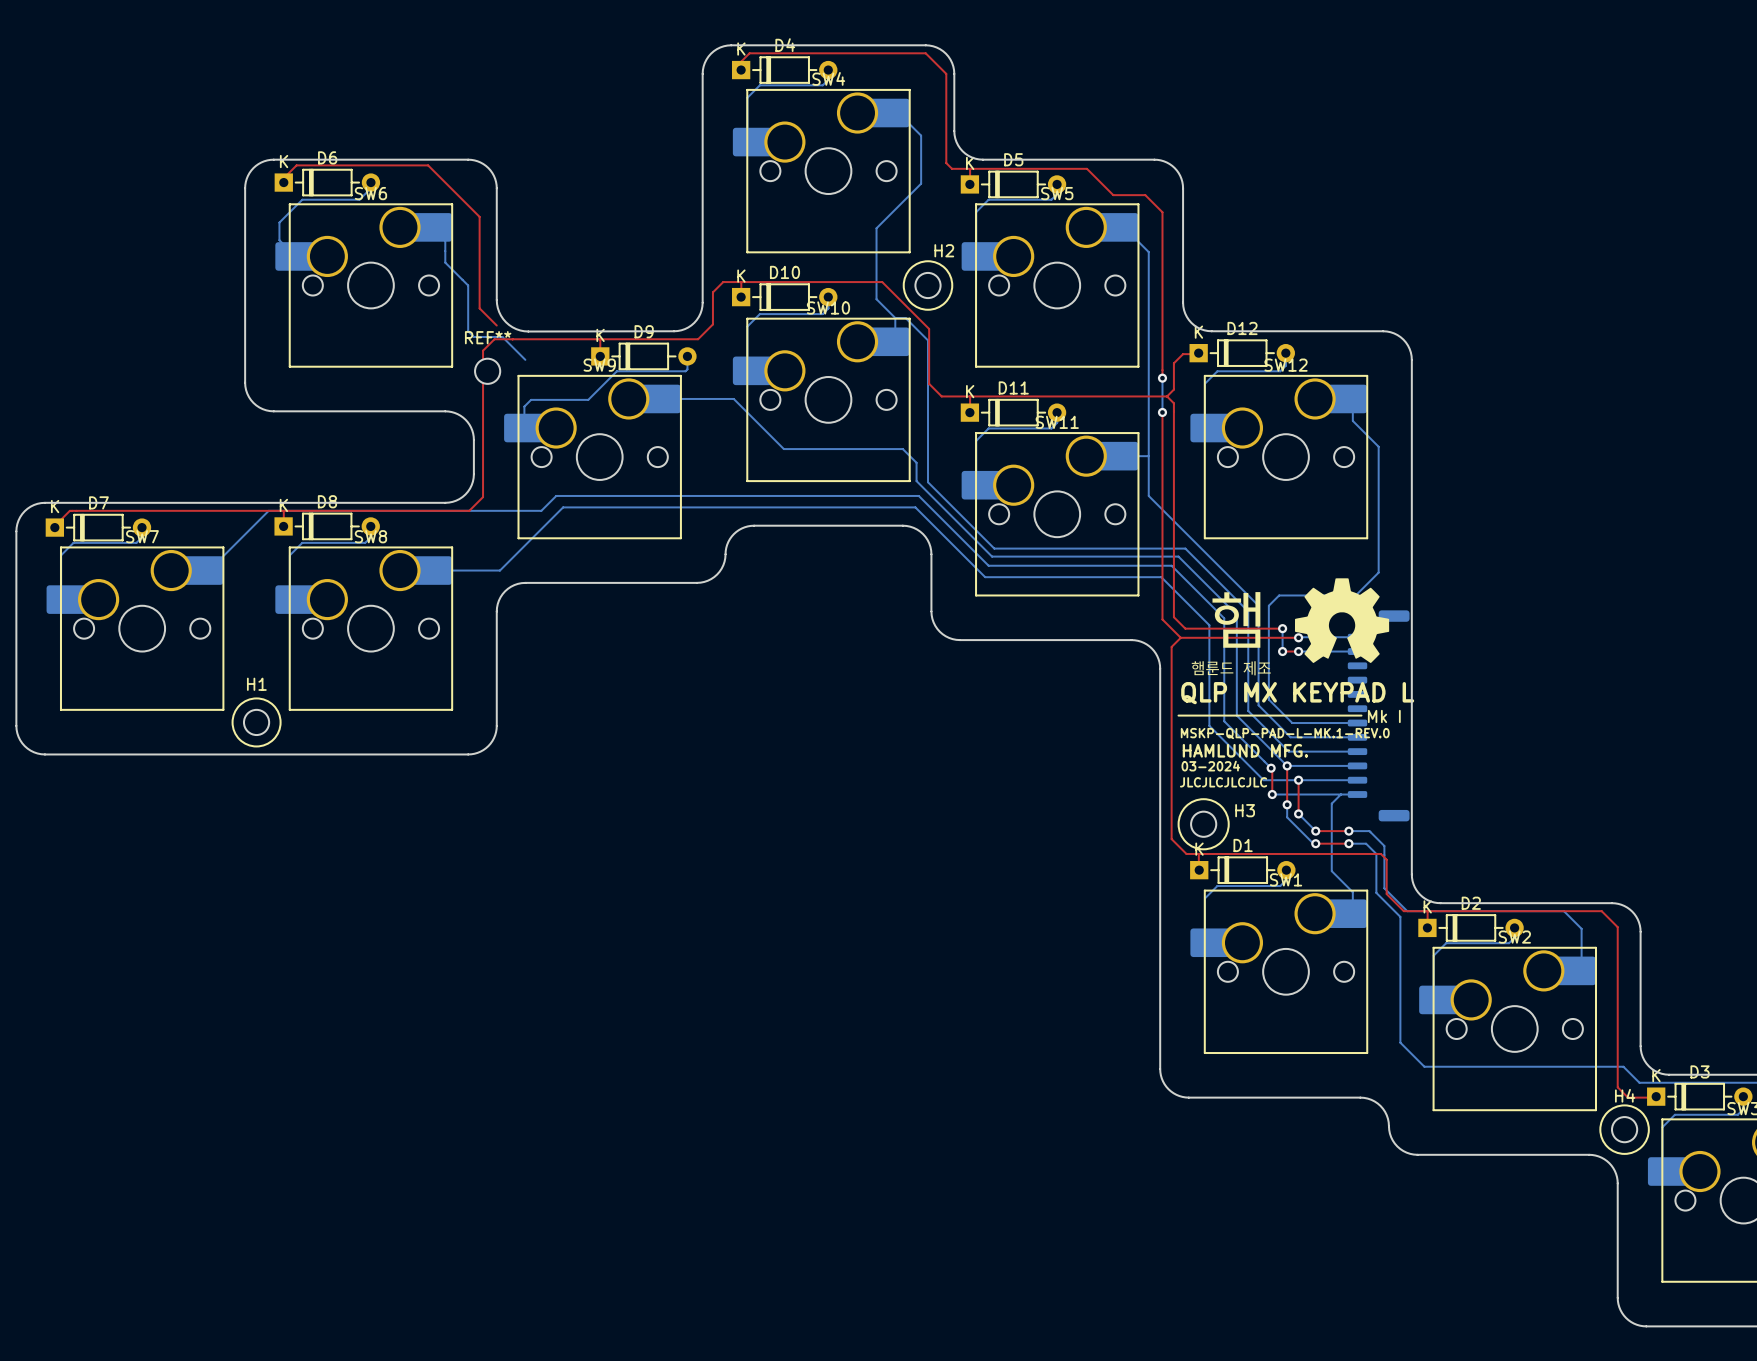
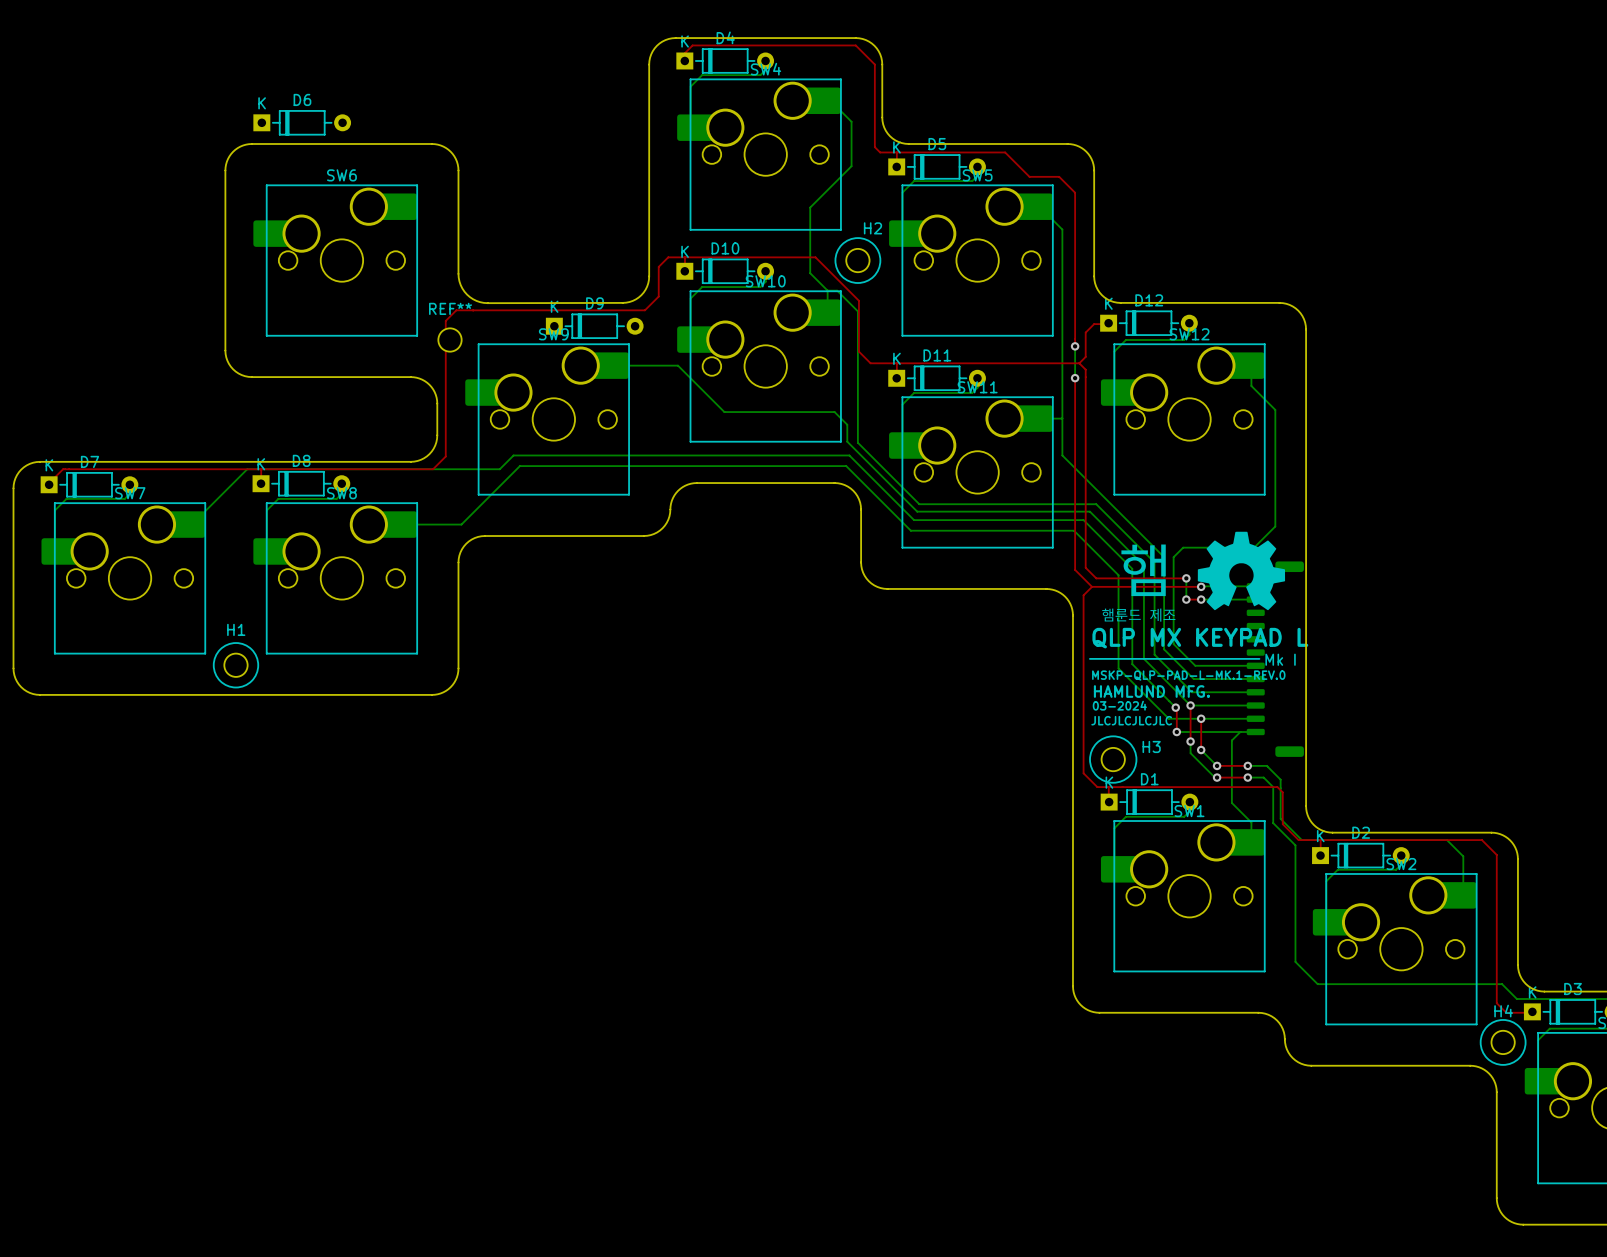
top track: (283, 182) (283, 178) (296, 165) (428, 165) (479, 216) (479, 308) (496, 325) -> none
D6 position: (327, 182) -> (302, 122)
bottom track: (370, 182) (370, 188) (359, 199) (302, 199) (279, 222) (279, 240) (295, 256) -> none
bottom track: (431, 227) (445, 240) (445, 262) (468, 285) (468, 331) (473, 336) (502, 336) (525, 359) -> none
top track: (599, 339) (600, 356) -> none
bottom track: (687, 356) (687, 369) (685, 371) (616, 371) (588, 399) (531, 399) (524, 406) (524, 428) -> none

